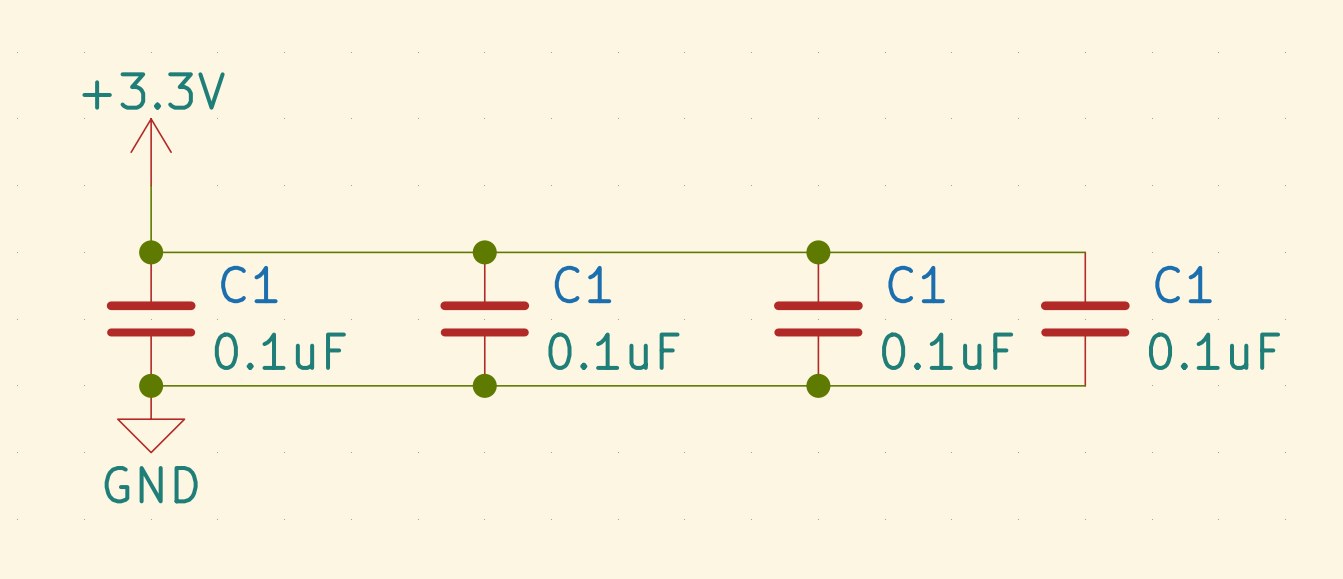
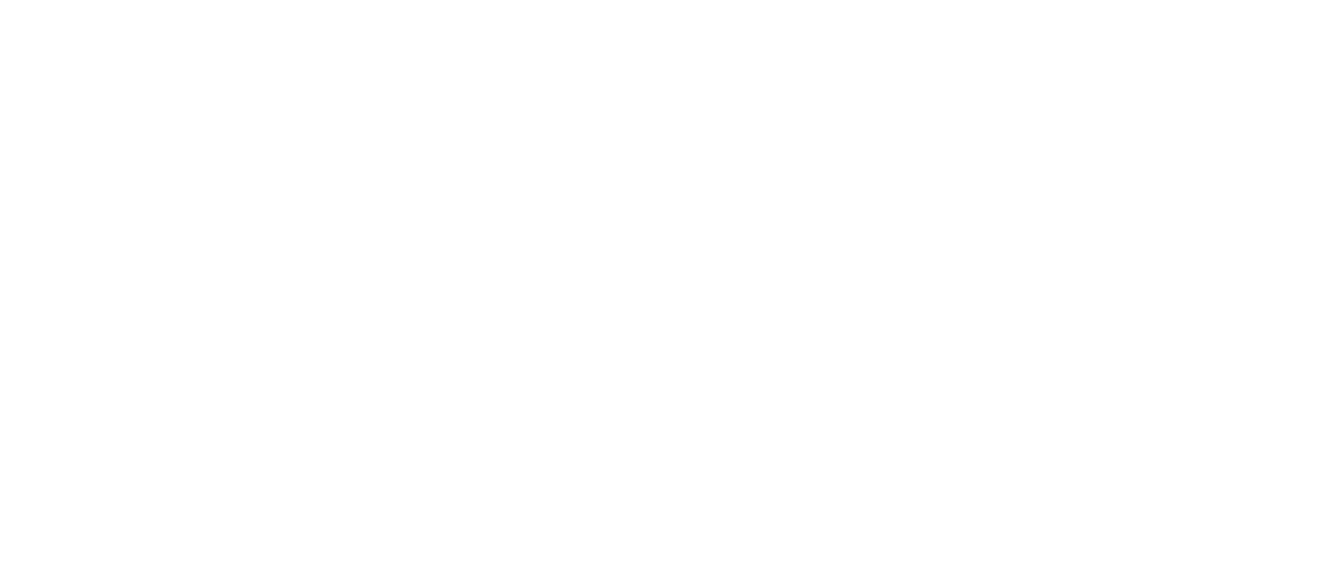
power symbol: +3.3V (151, 152) -> none
wire: (151, 185) (151, 252) (1085, 252) -> none
junction: (151, 252) -> none
junction: (484, 252) -> none
junction: (818, 252) -> none
C1: 0.1uF (151, 319) -> none
C1: 0.1uF (484, 319) -> none
C1: 0.1uF (818, 319) -> none
C1: 0.1uF (1085, 319) -> none
wire: (151, 385) (1085, 385) -> none
junction: (151, 385) -> none
junction: (484, 385) -> none
junction: (818, 385) -> none
power symbol: GND (151, 419) -> none

